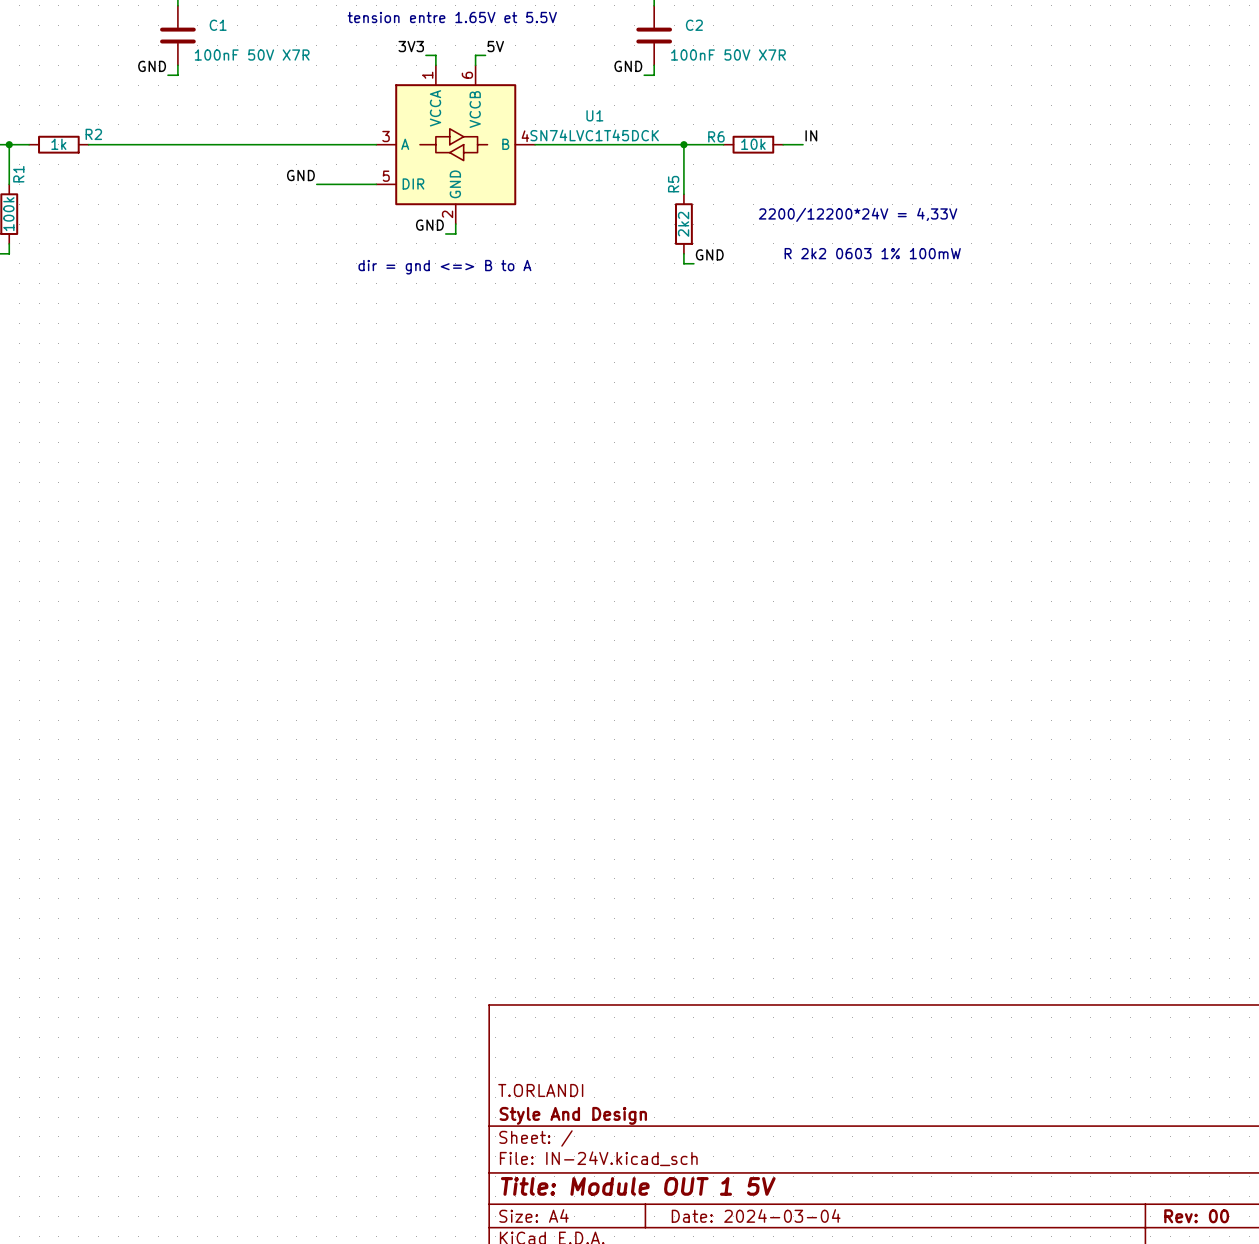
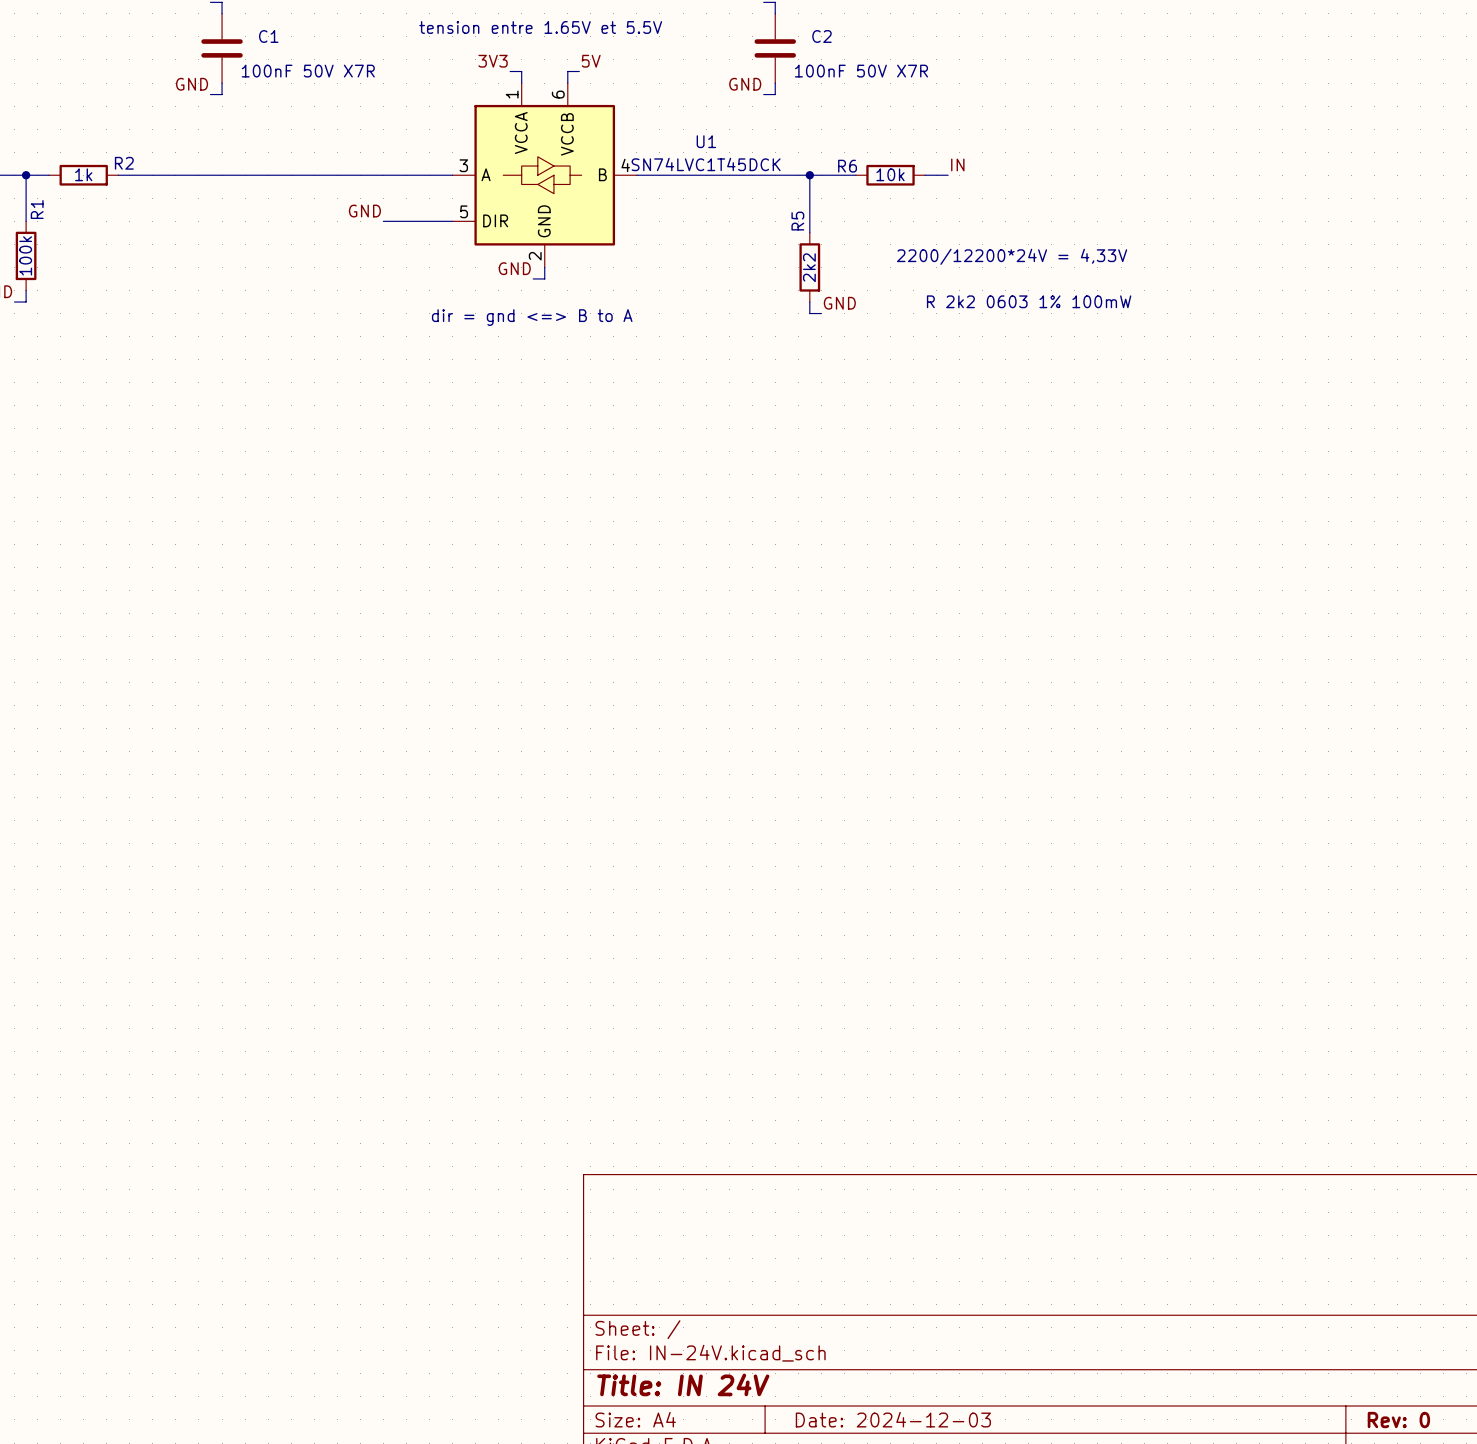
title block: T.ORLANDI (540, 1090) -> none
title block: Style And Design (573, 1115) -> none
title block: Title: Module OUT 1 5V (638, 1186) -> Title: IN 24V (683, 1384)
title block: Date: 2024-03-04 (756, 1215) -> Date: 2024-12-03 (893, 1419)
title block: Rev: 00 (1196, 1216) -> Rev: 0 (1398, 1420)

